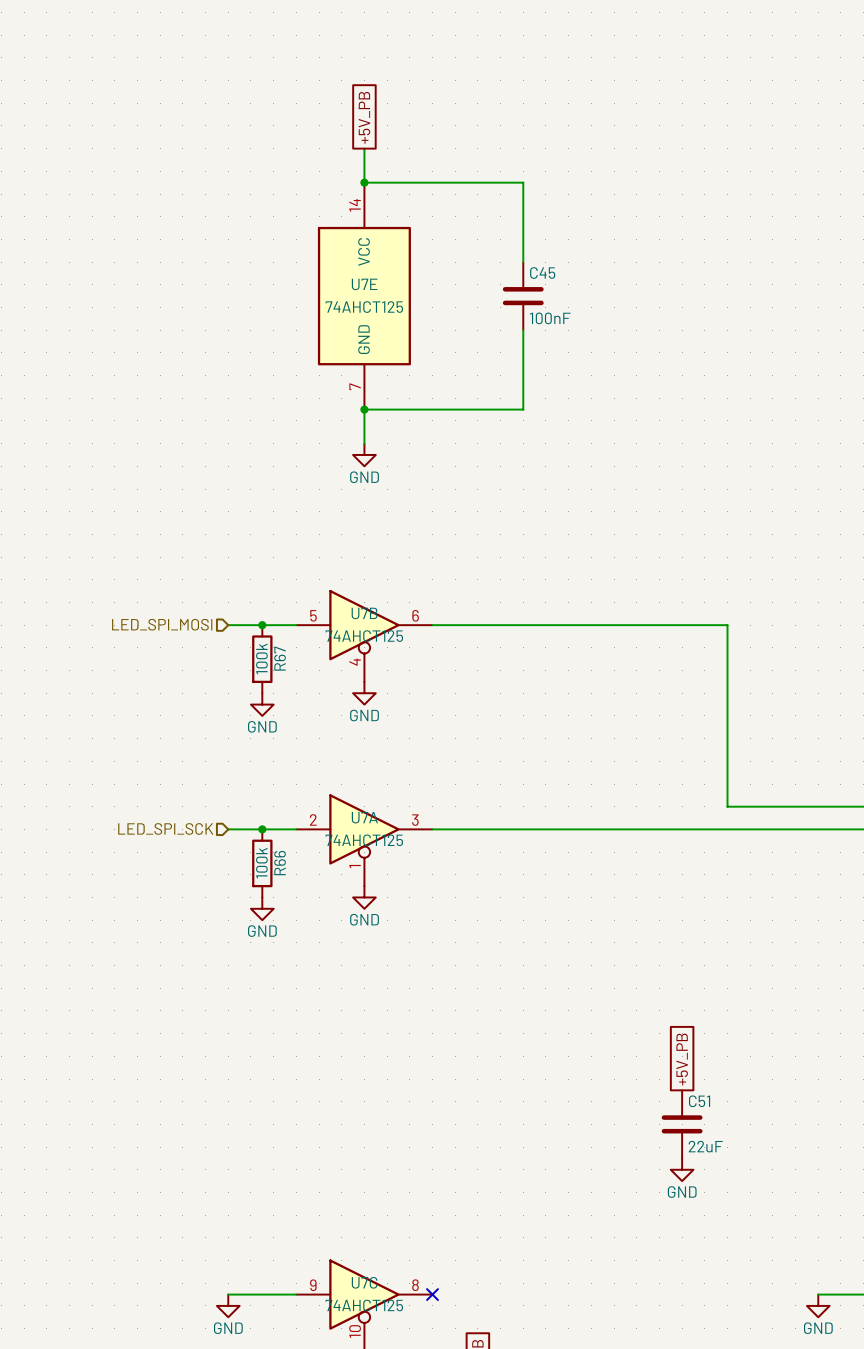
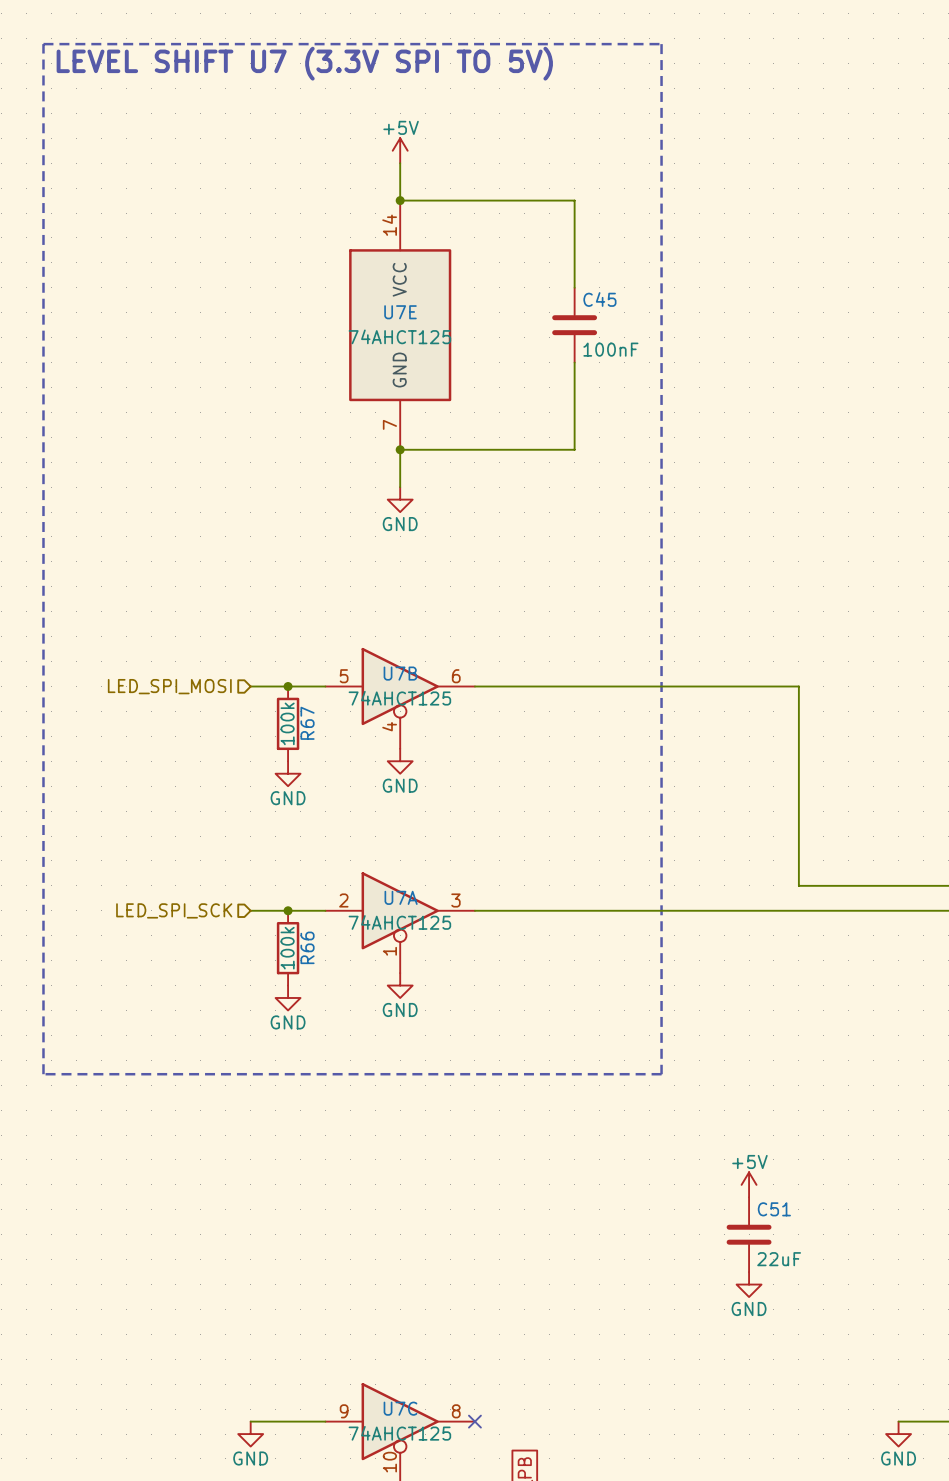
line: none -> (43, 44) (661, 44) (661, 1074) (43, 1074) (43, 44)
text: none -> LEVEL SHIFT U7 (3.3V SPI TO 5V) (304, 63)
global label: +5V_PB (364, 117) -> none
power symbol: none -> +5V (400, 150)
global label: +5V_PB (682, 1059) -> none
power symbol: none -> +5V (749, 1184)

